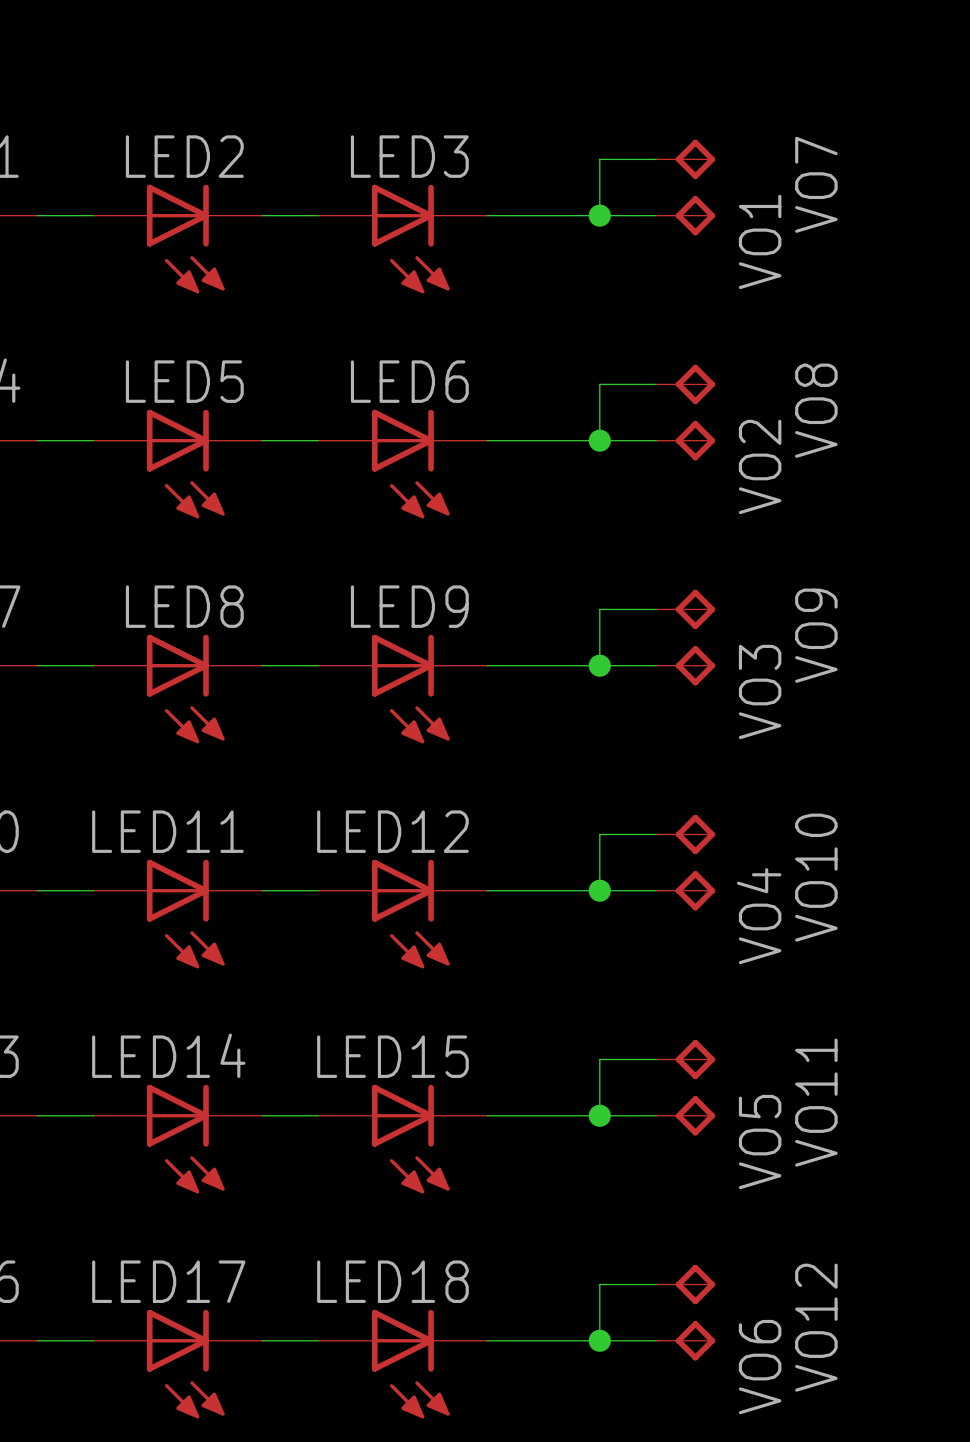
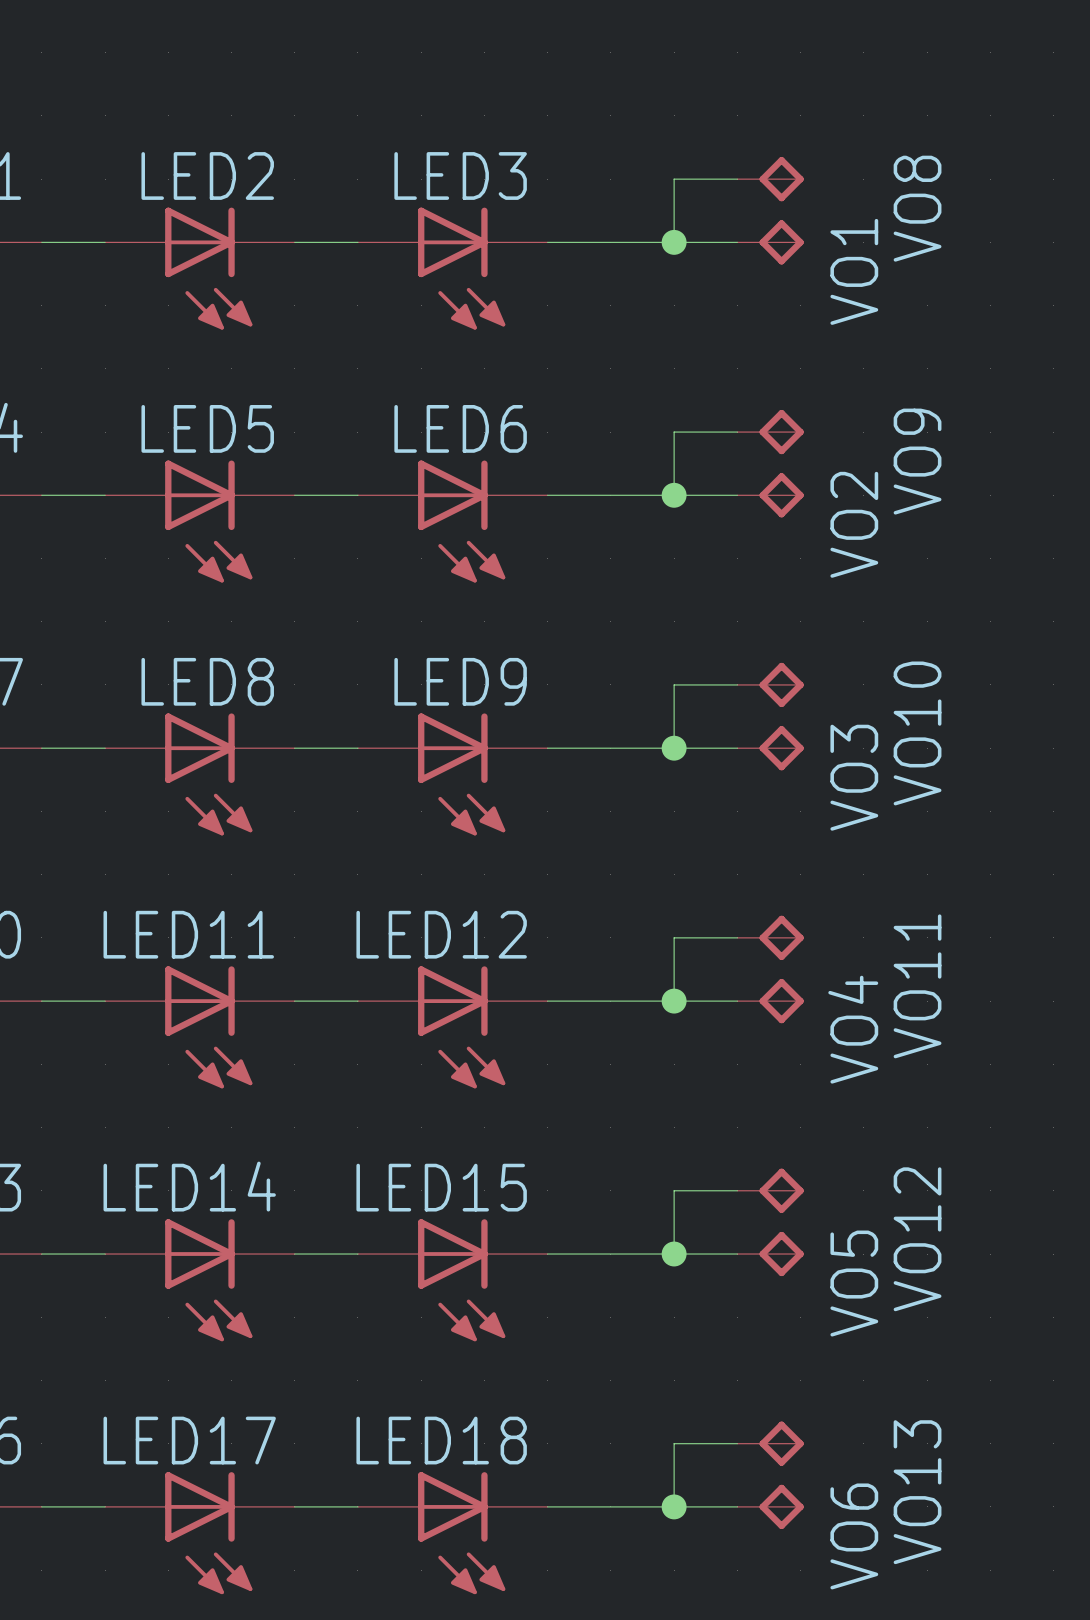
VO7 name: VO7 (816, 184) -> VO8 (917, 208)
VO8 name: VO8 (816, 410) -> VO9 (917, 461)
VO9 name: VO9 (816, 635) -> VO10 (917, 733)
VO10 name: VO10 (816, 877) -> VO11 (917, 986)
VO11 name: VO11 (816, 1102) -> VO12 (917, 1239)
VO12 name: VO12 (816, 1327) -> VO13 (917, 1492)

